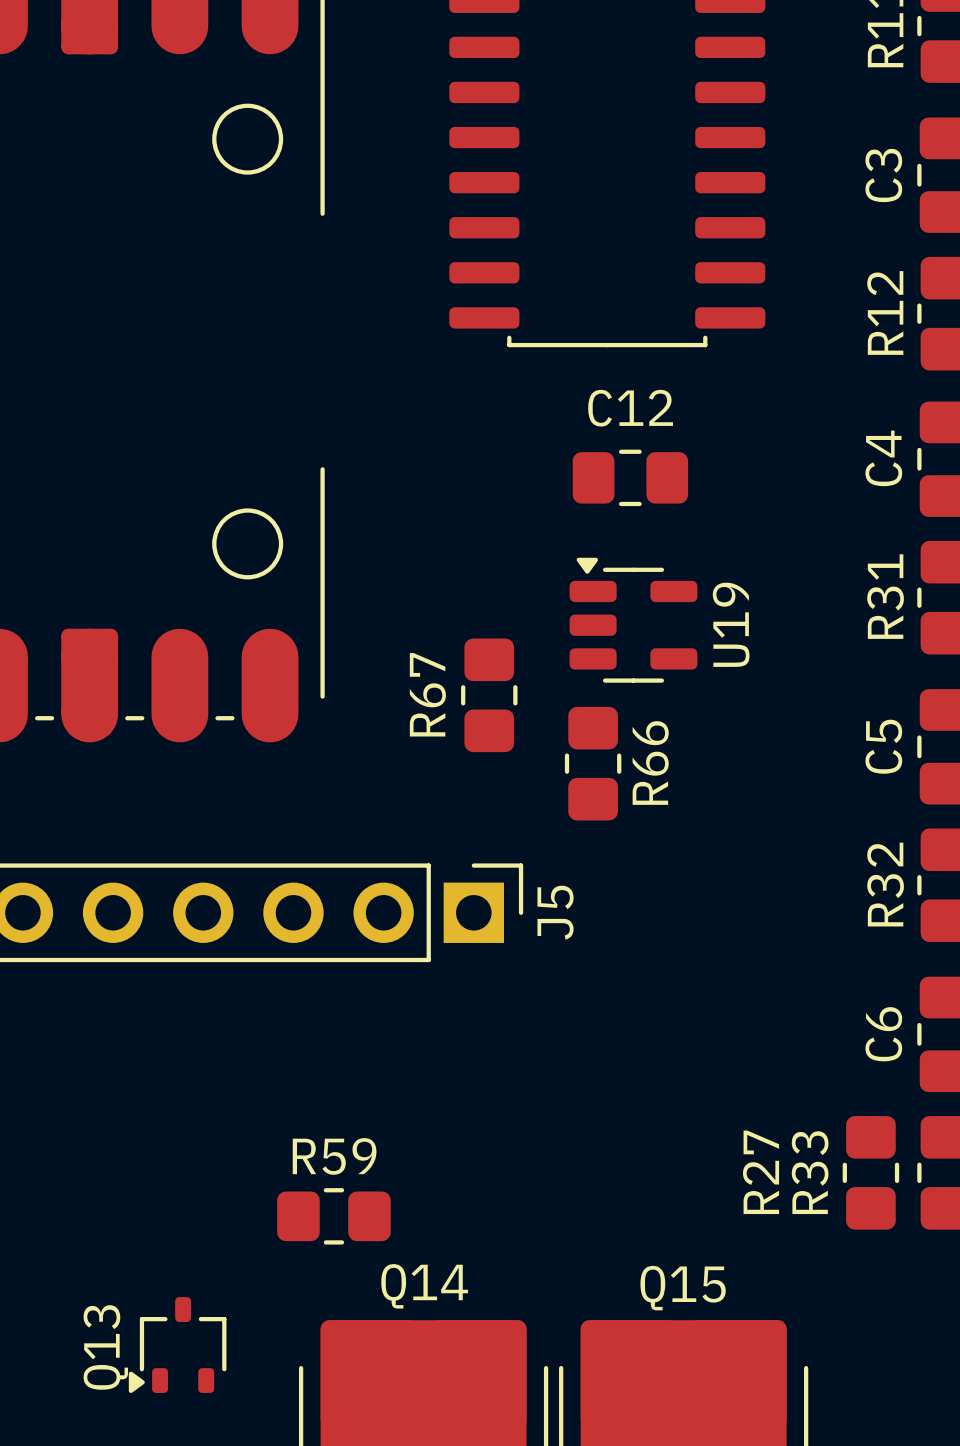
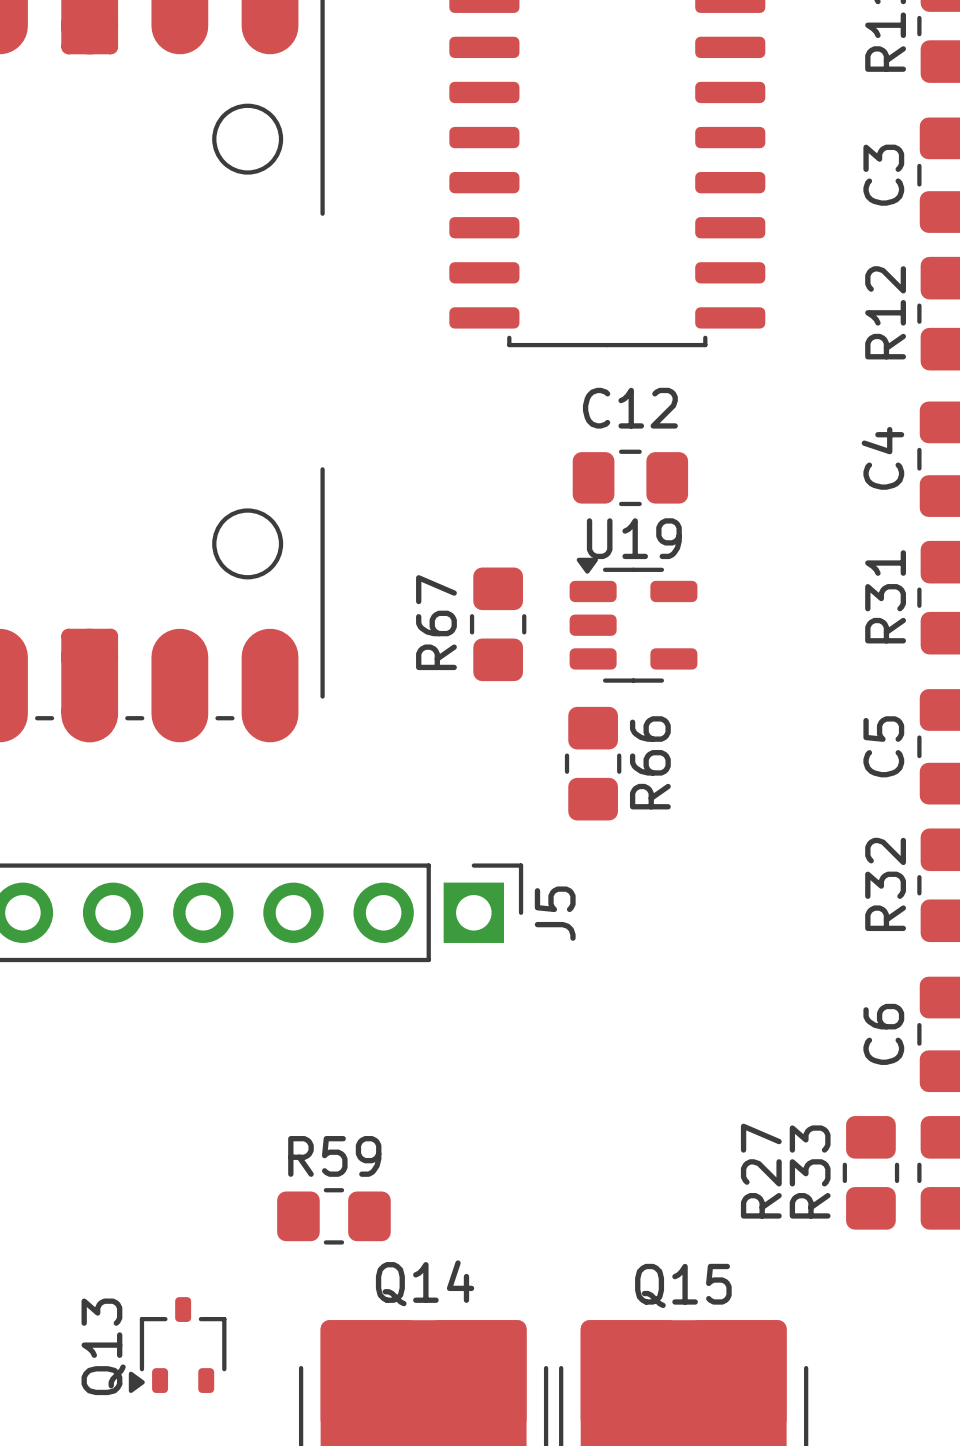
U19 name rotation: 0° (731, 624) -> 90° clockwise (634, 538)
U19 name position: U19 (731, 624) -> U19 (634, 538)
R67 position: (489, 695) -> (498, 624)

